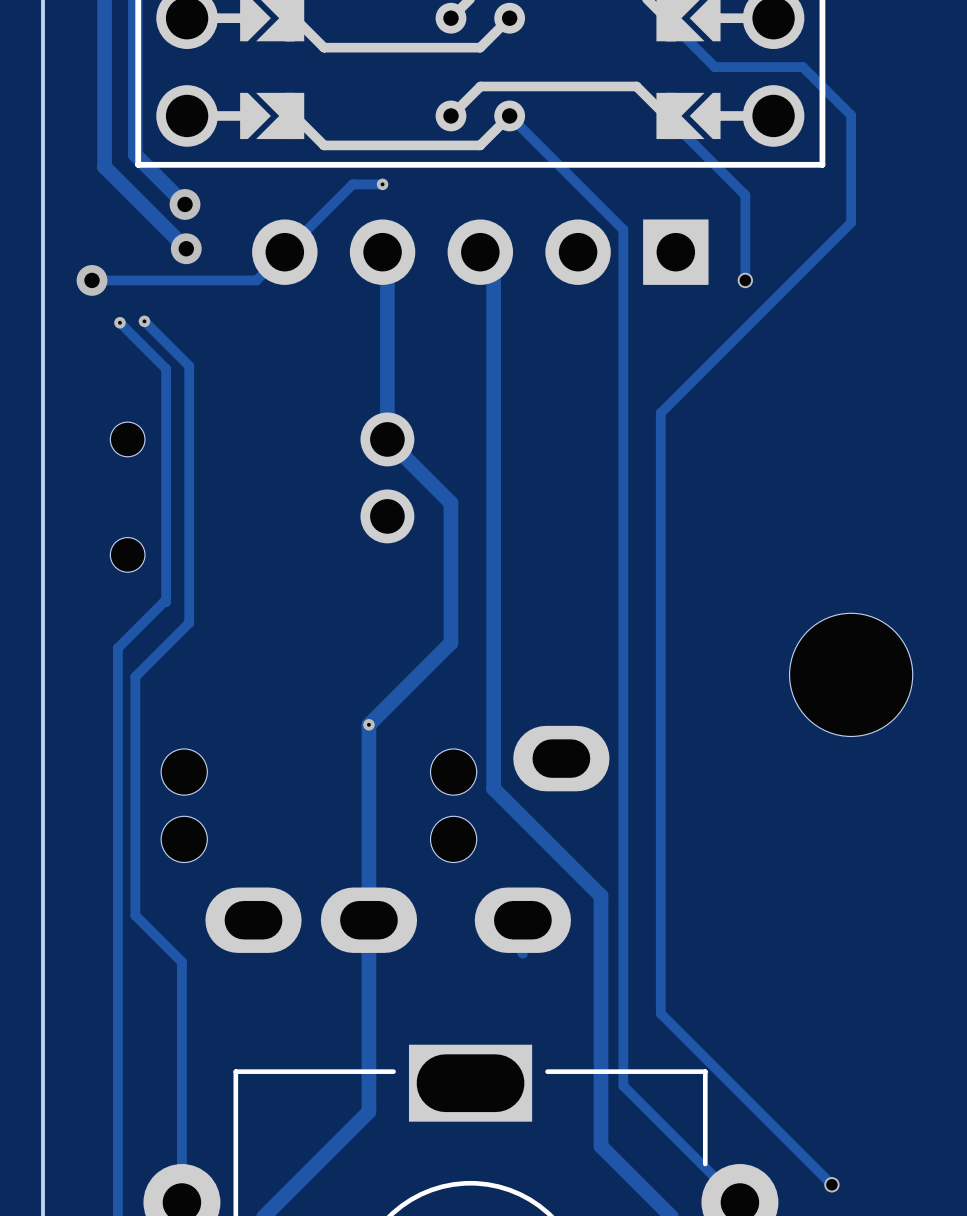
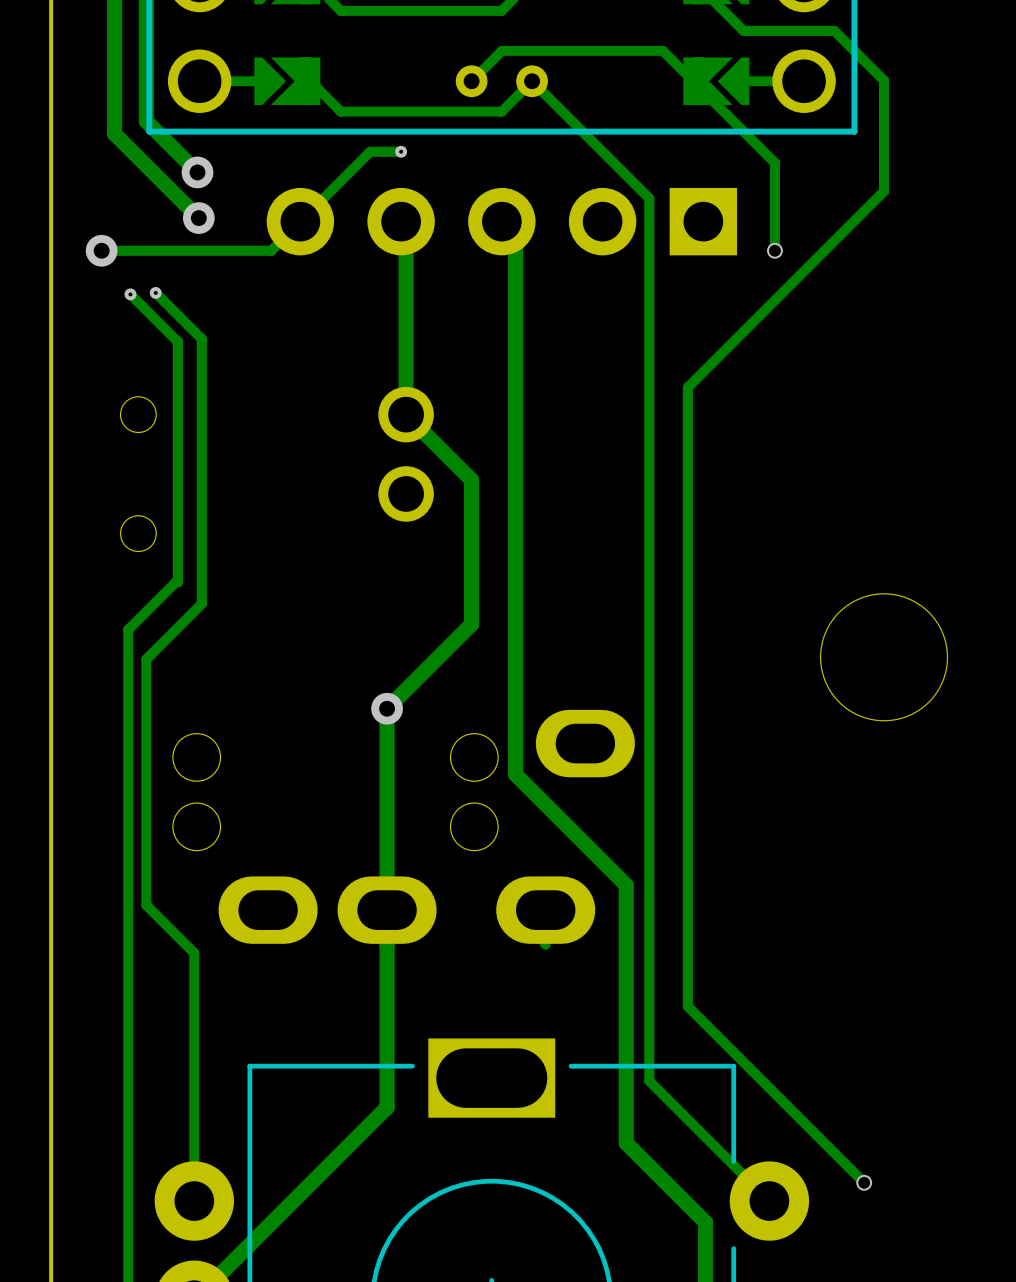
via size: [363, 719, 375, 731] -> [371, 692, 403, 725]

